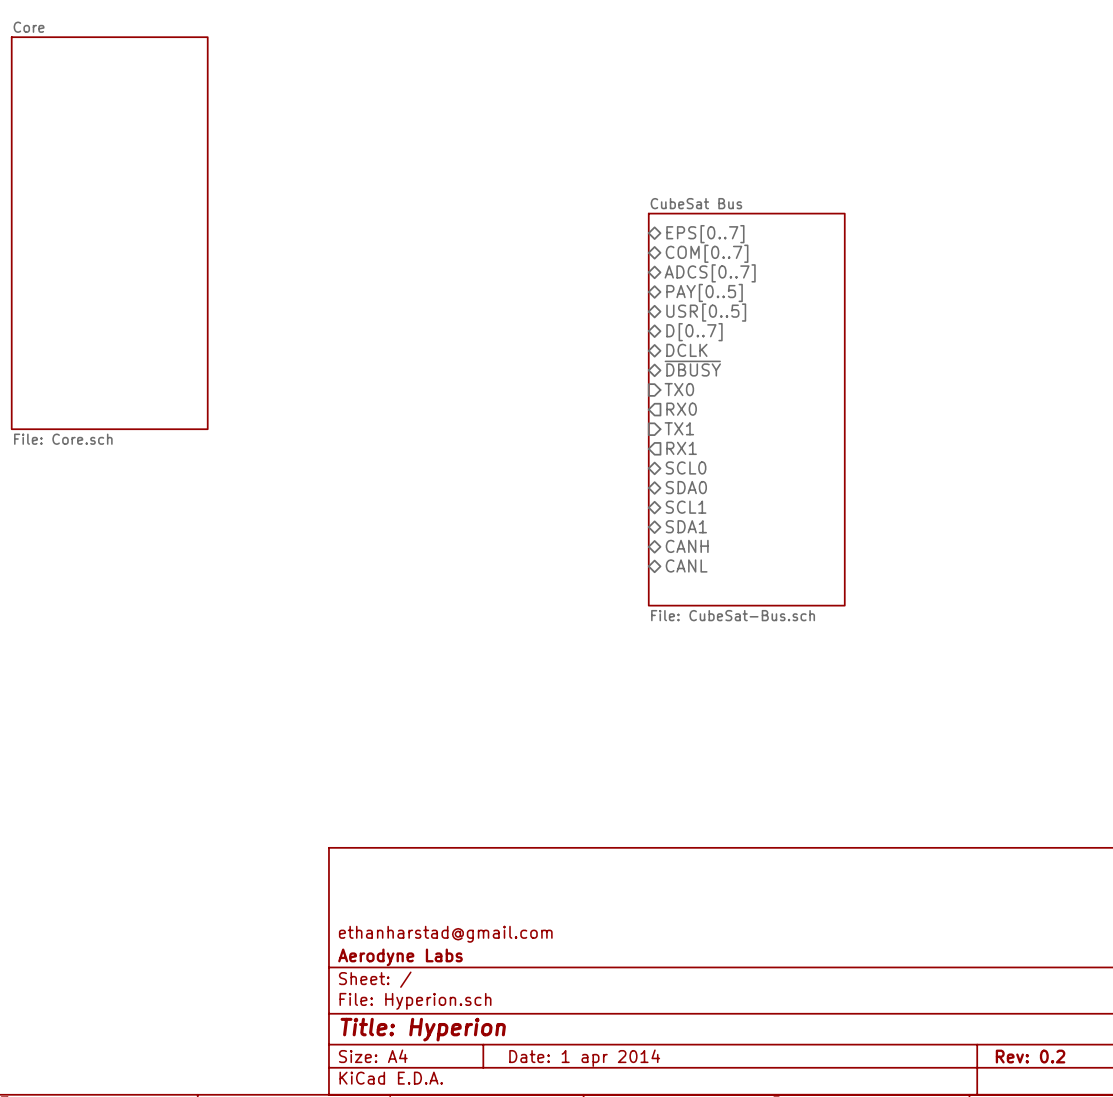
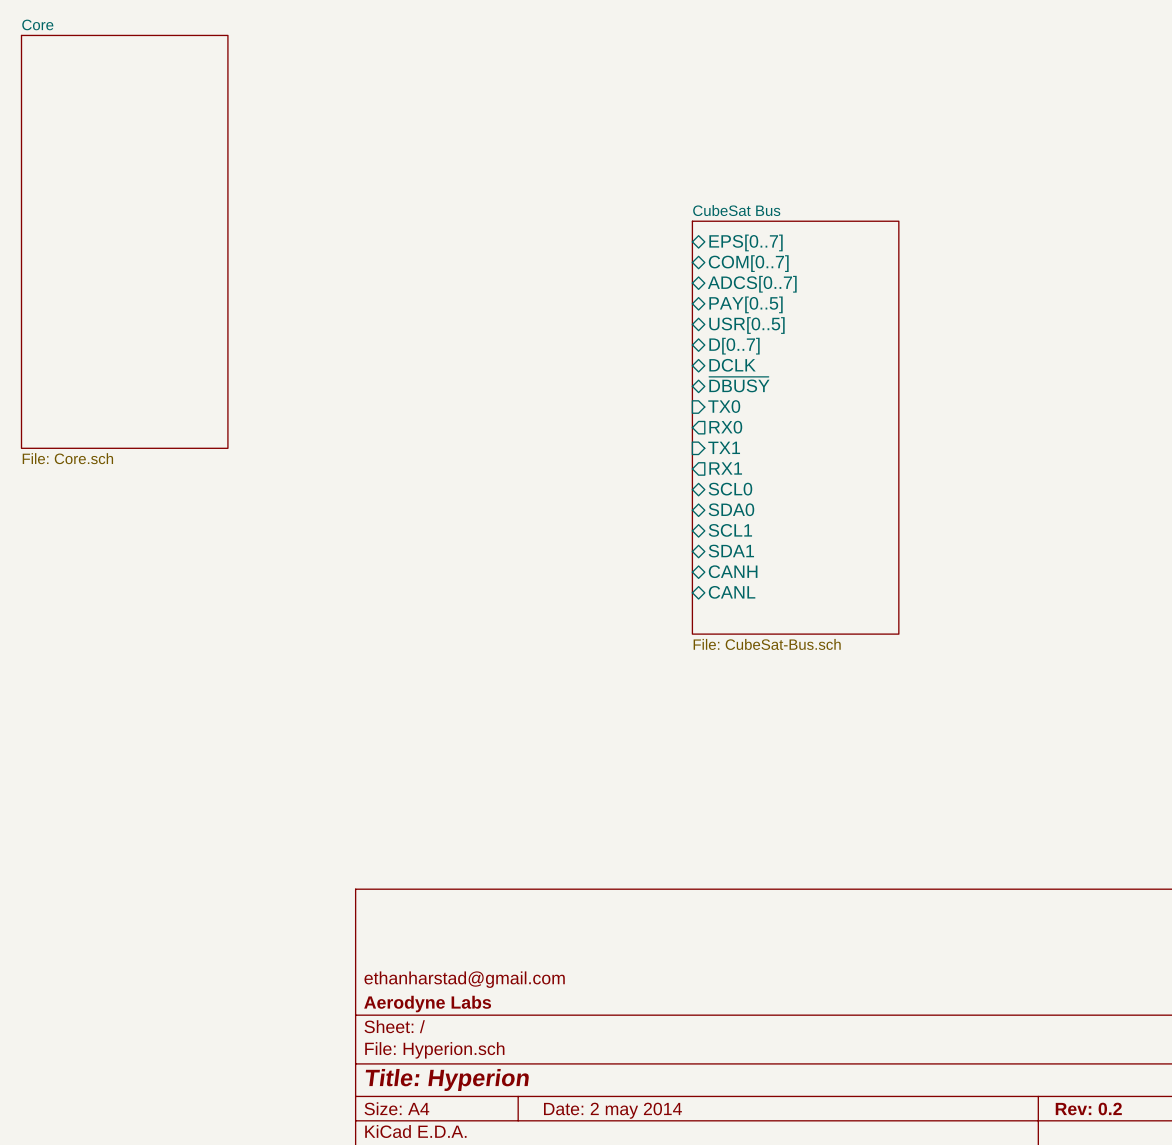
title block: Date: 1 apr 2014 (584, 1058) -> Date: 2 may 2014 (612, 1110)

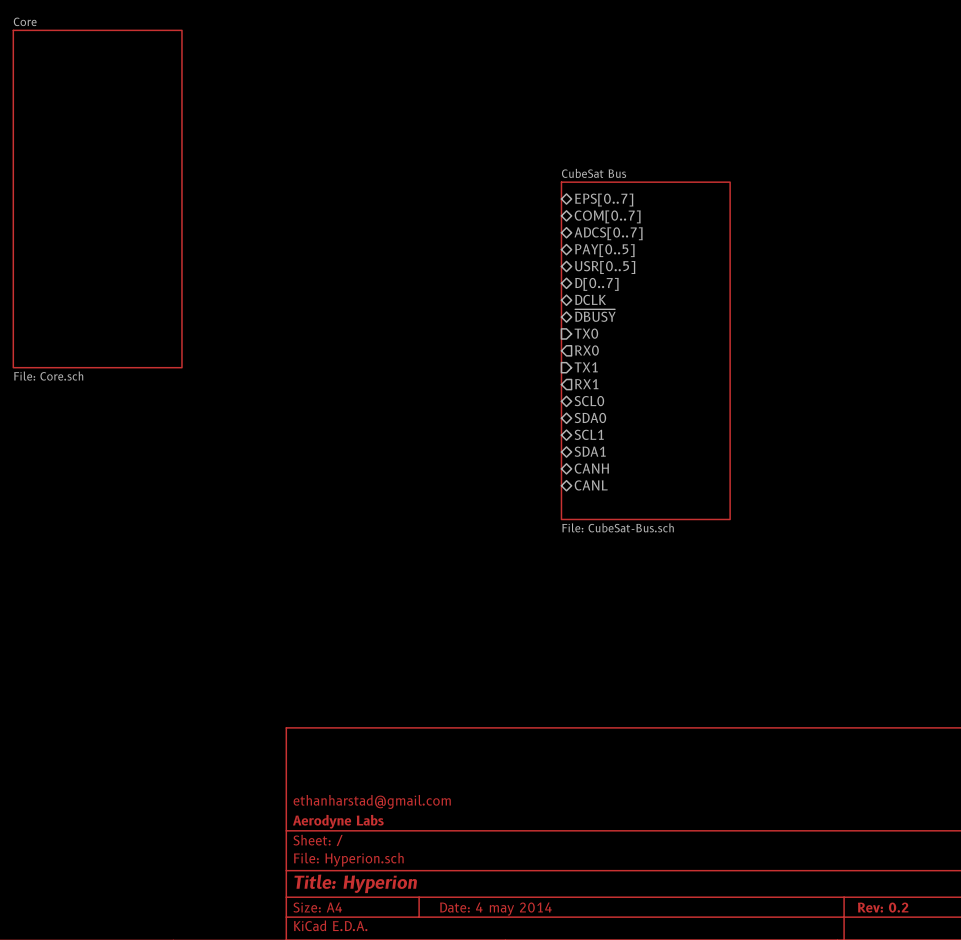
title block: Date: 2 may 2014 (612, 1110) -> Date: 4 may 2014 (495, 909)

